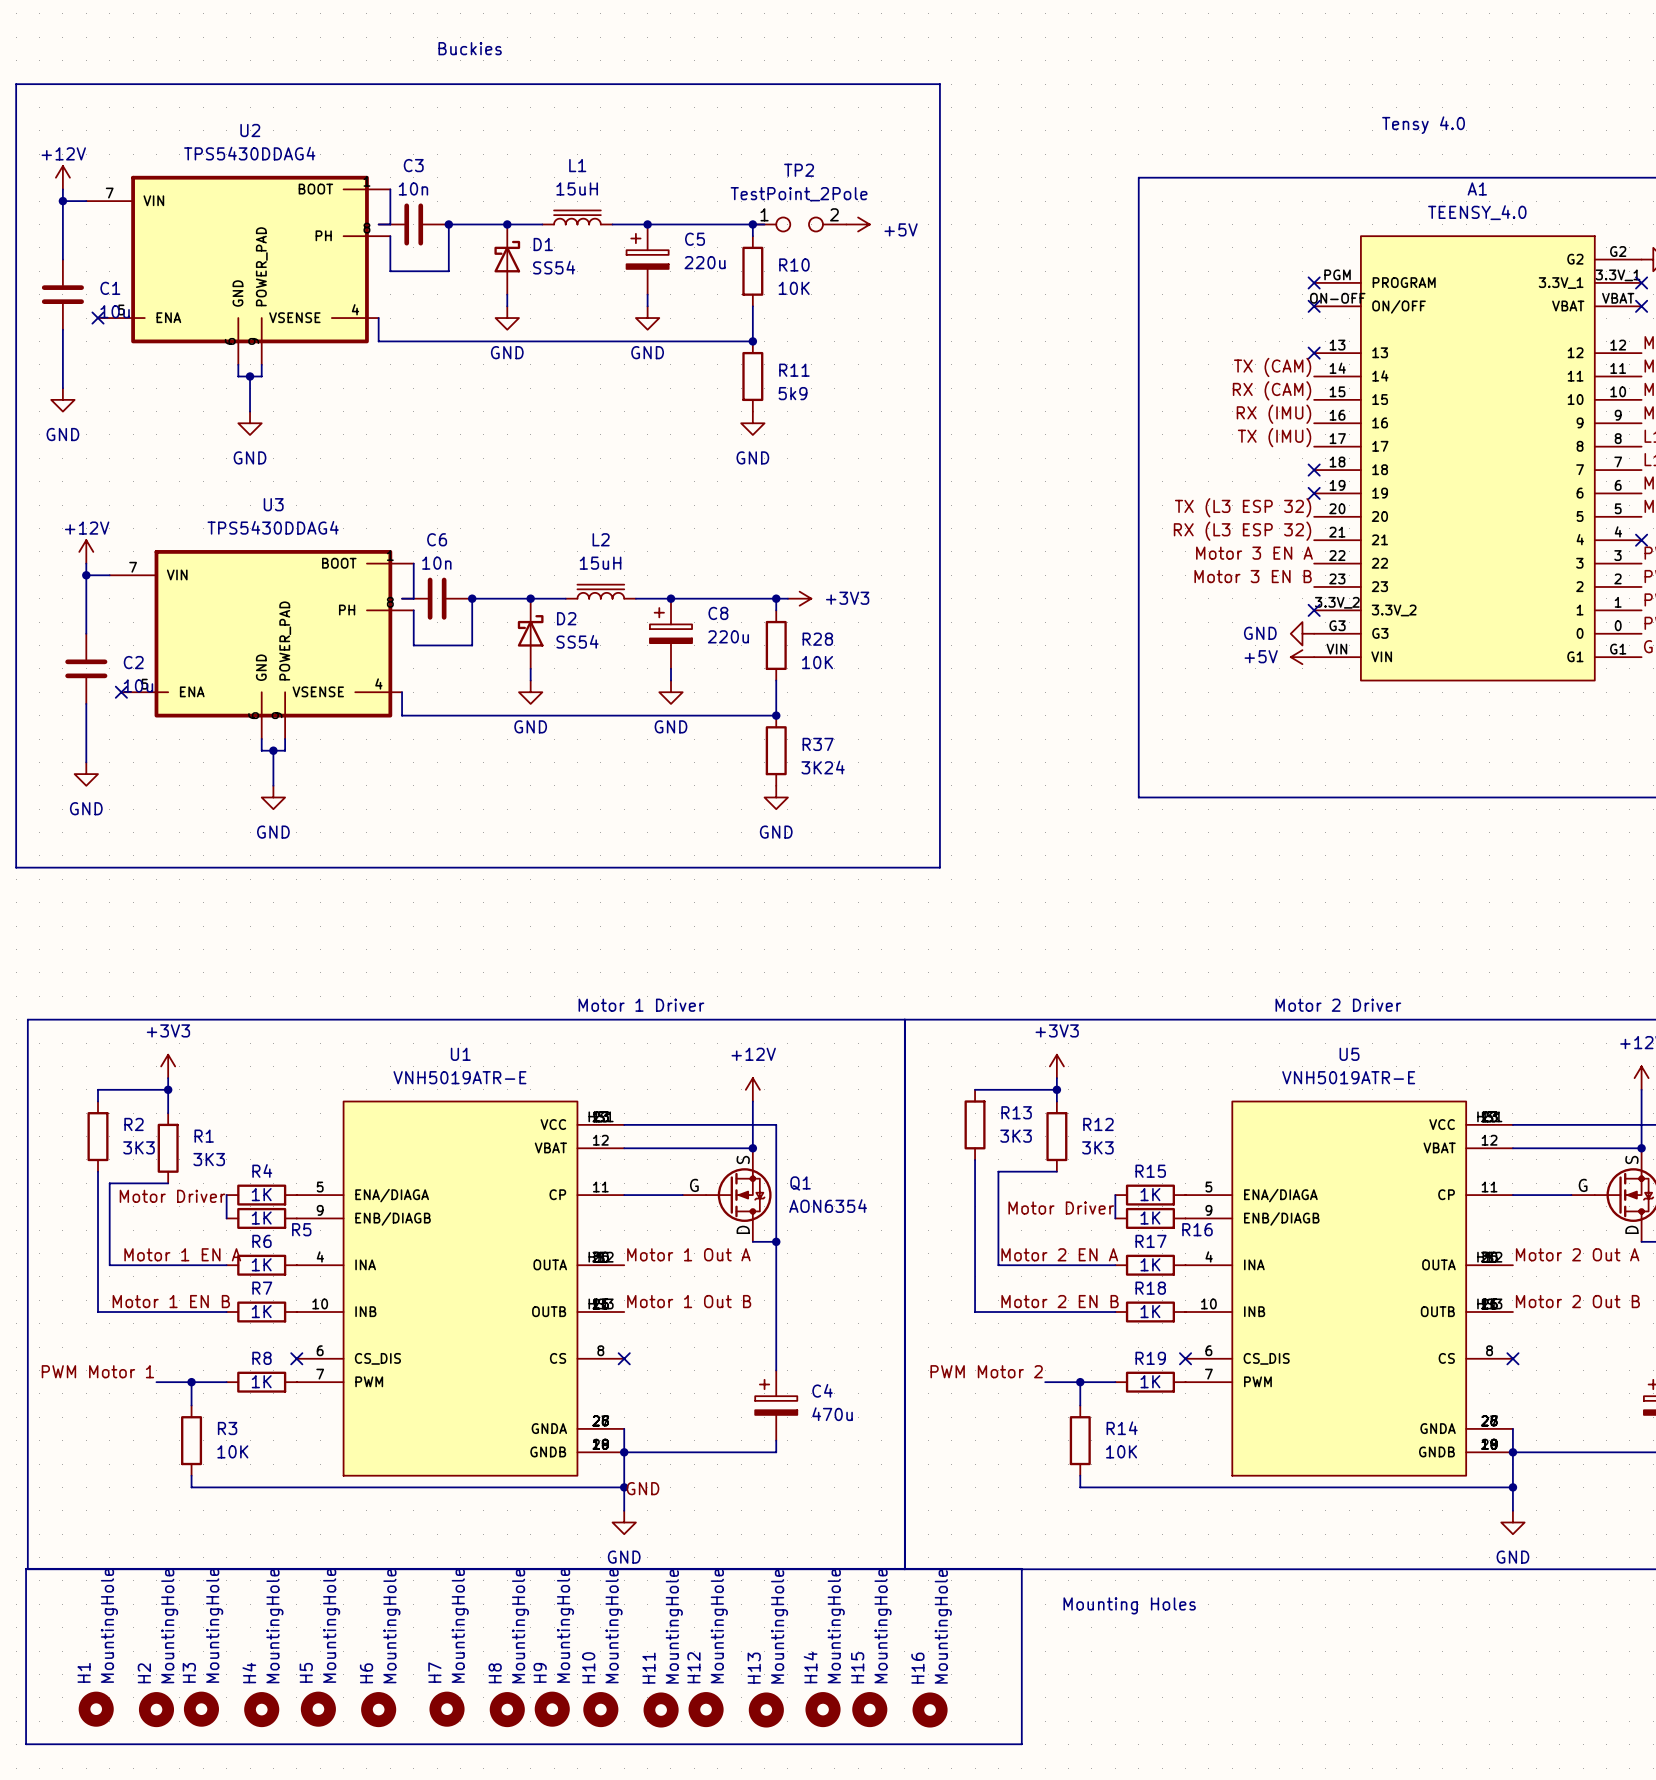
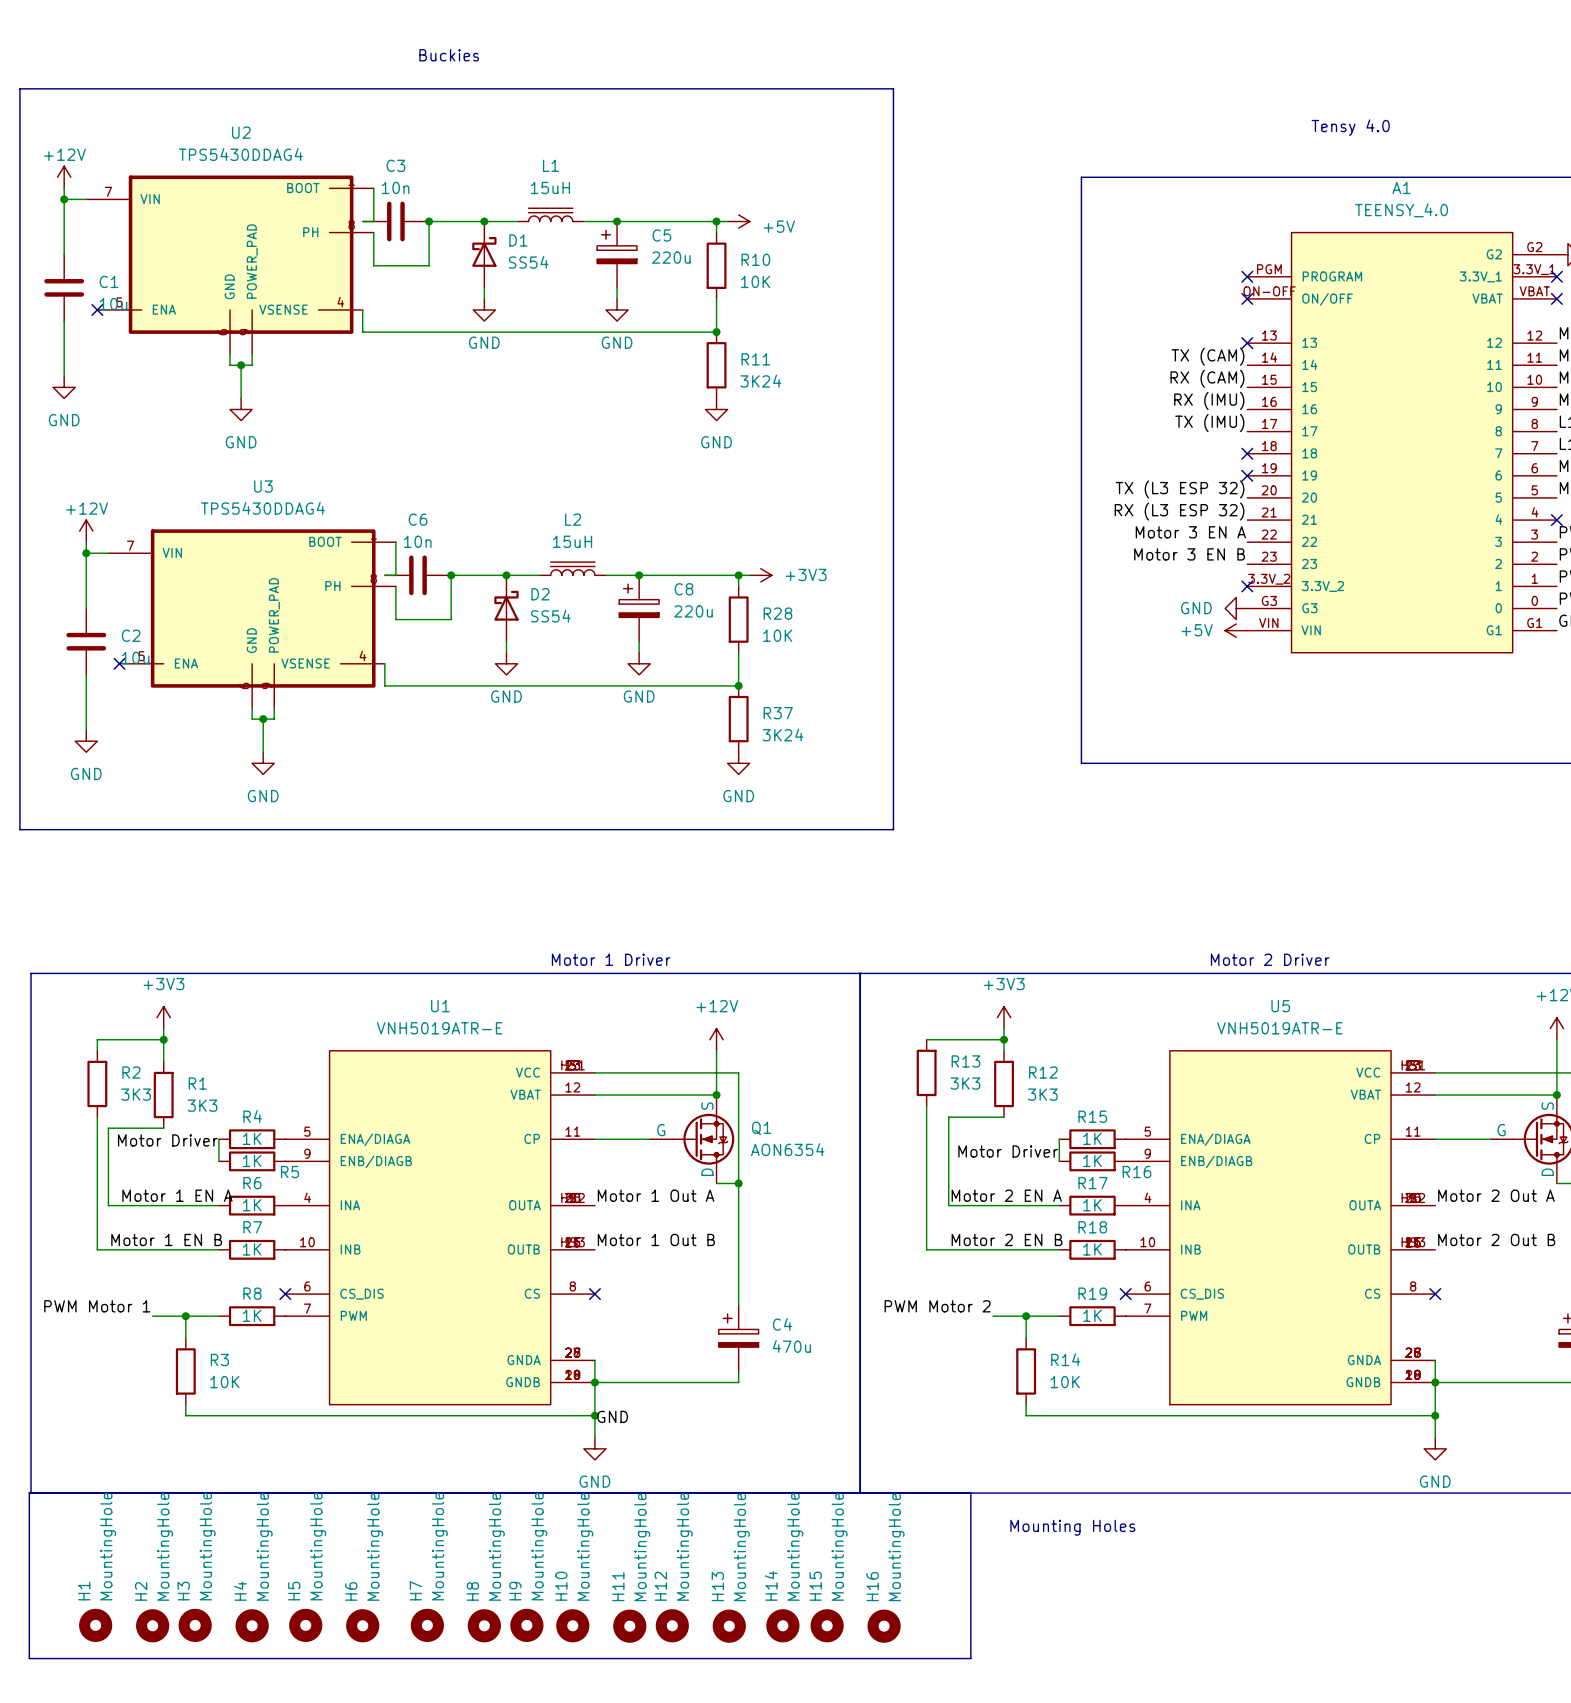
TP2: TestPoint_2Pole (799, 224) -> none
power symbol position: +5V (858, 224) -> +5V (738, 221)
R11 value: 5k9 (793, 393) -> 3K24 (760, 381)

